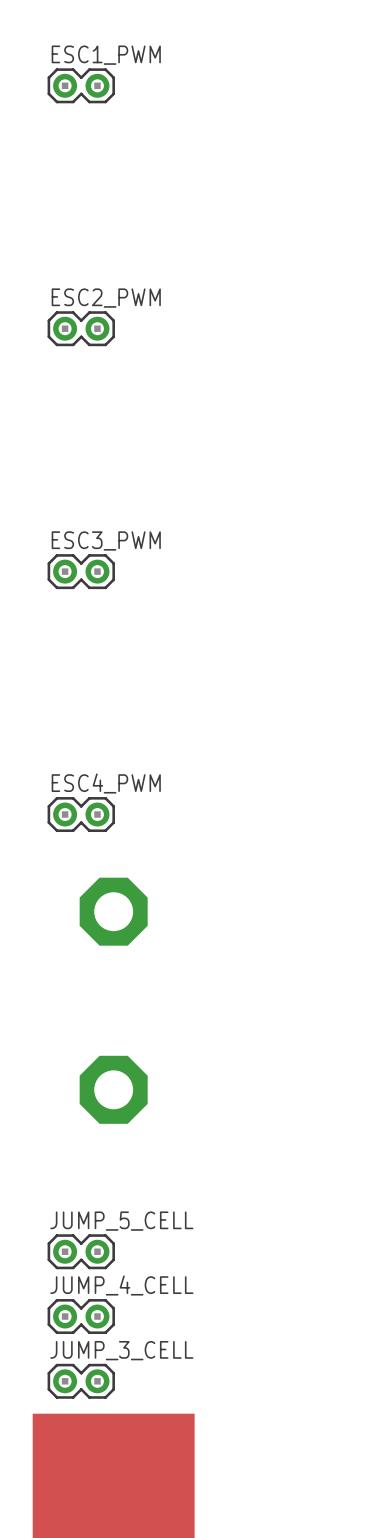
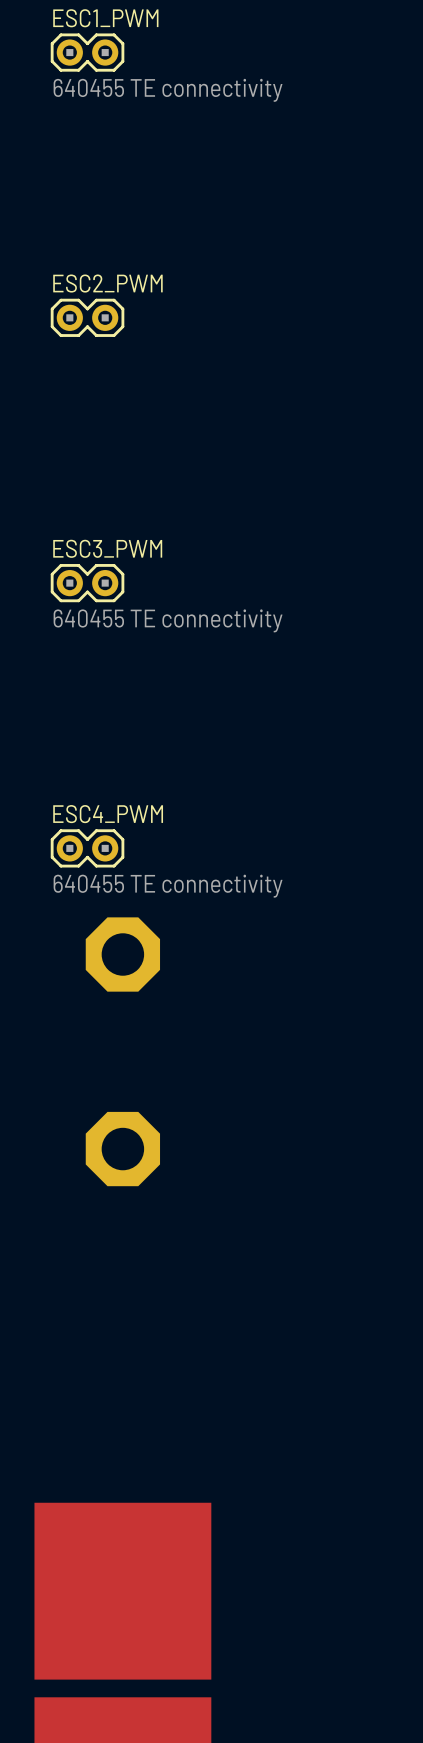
ESC1_PWM value: none -> 640455 TE connectivity (168, 90)
ESC3_PWM value: none -> 640455 TE connectivity (168, 620)
ESC4_PWM value: none -> 640455 TE connectivity (168, 886)
JUMP_5_CELL: (81, 1251) -> none
JUMP_4_CELL: (81, 1316) -> none
JUMP_3_CELL: (81, 1381) -> none

